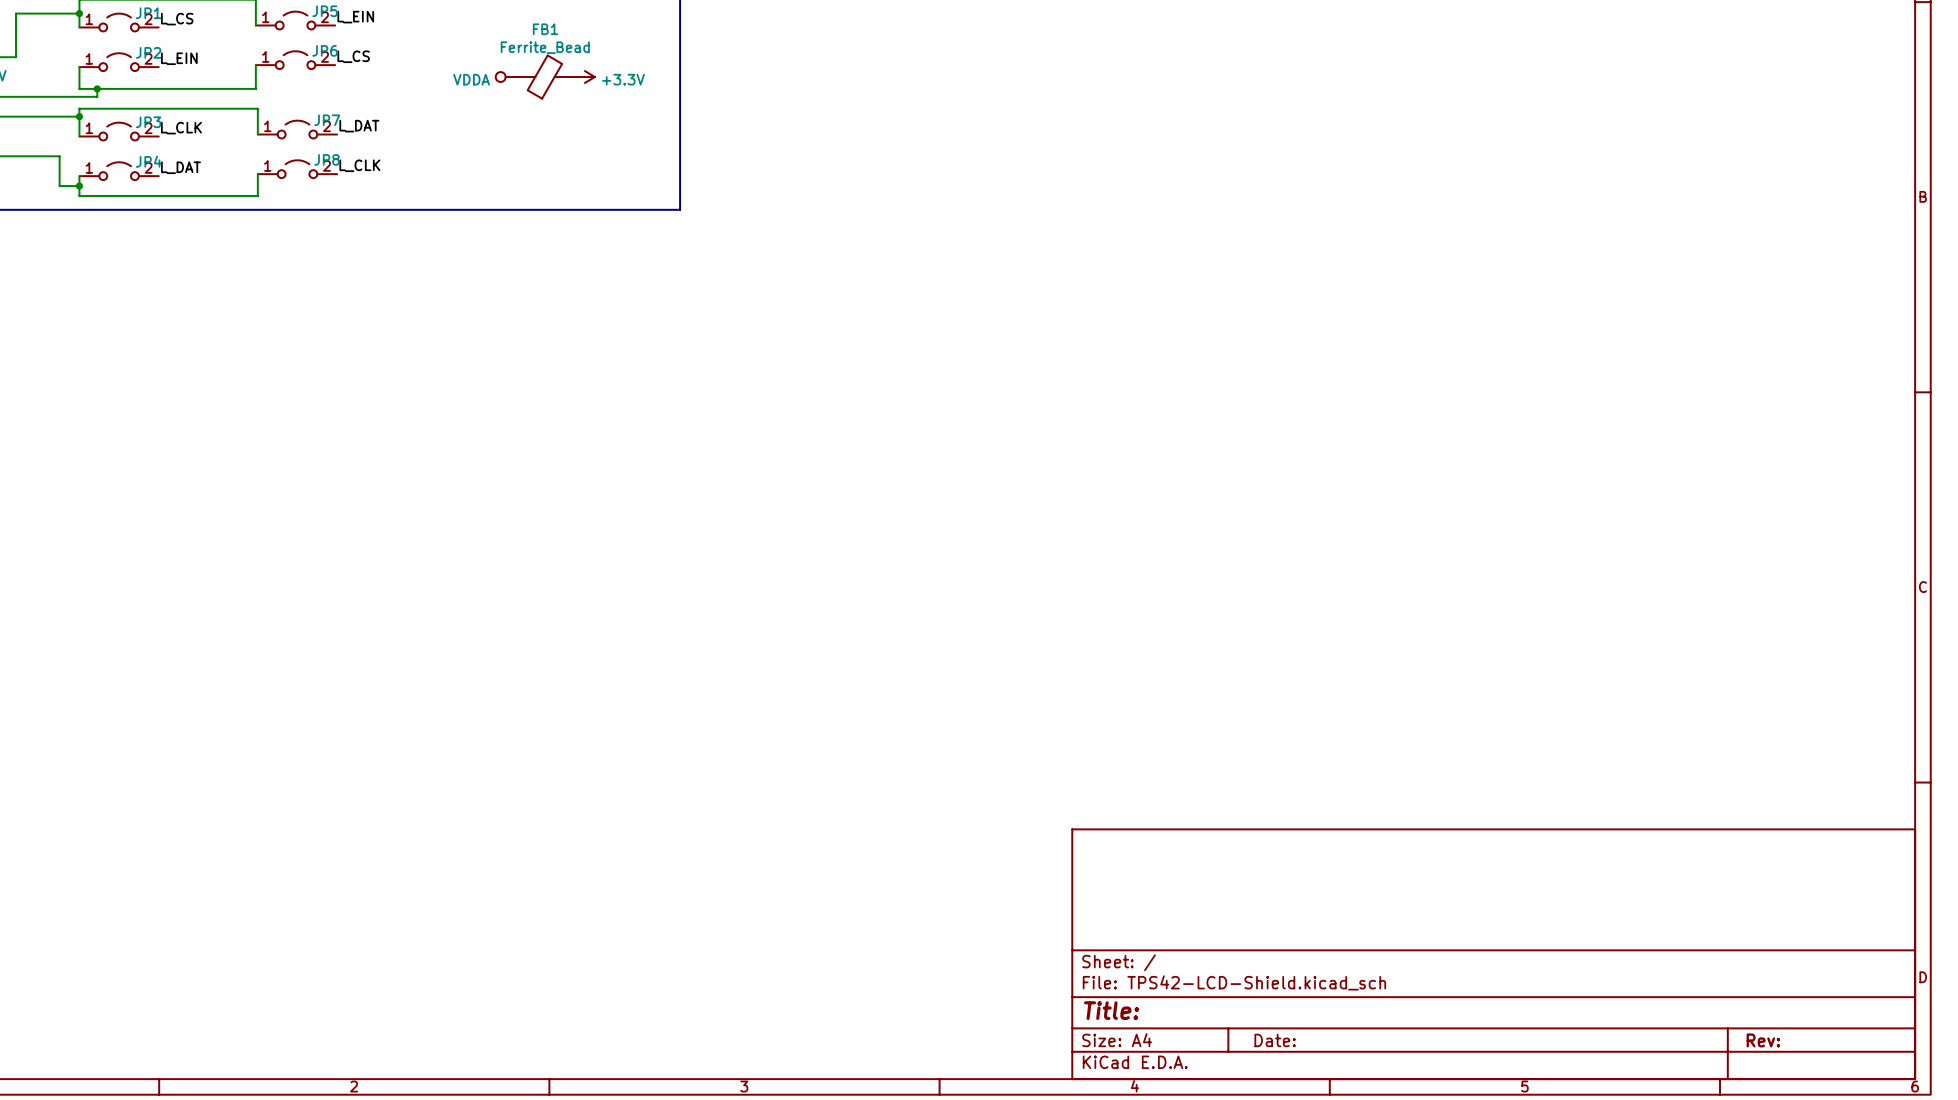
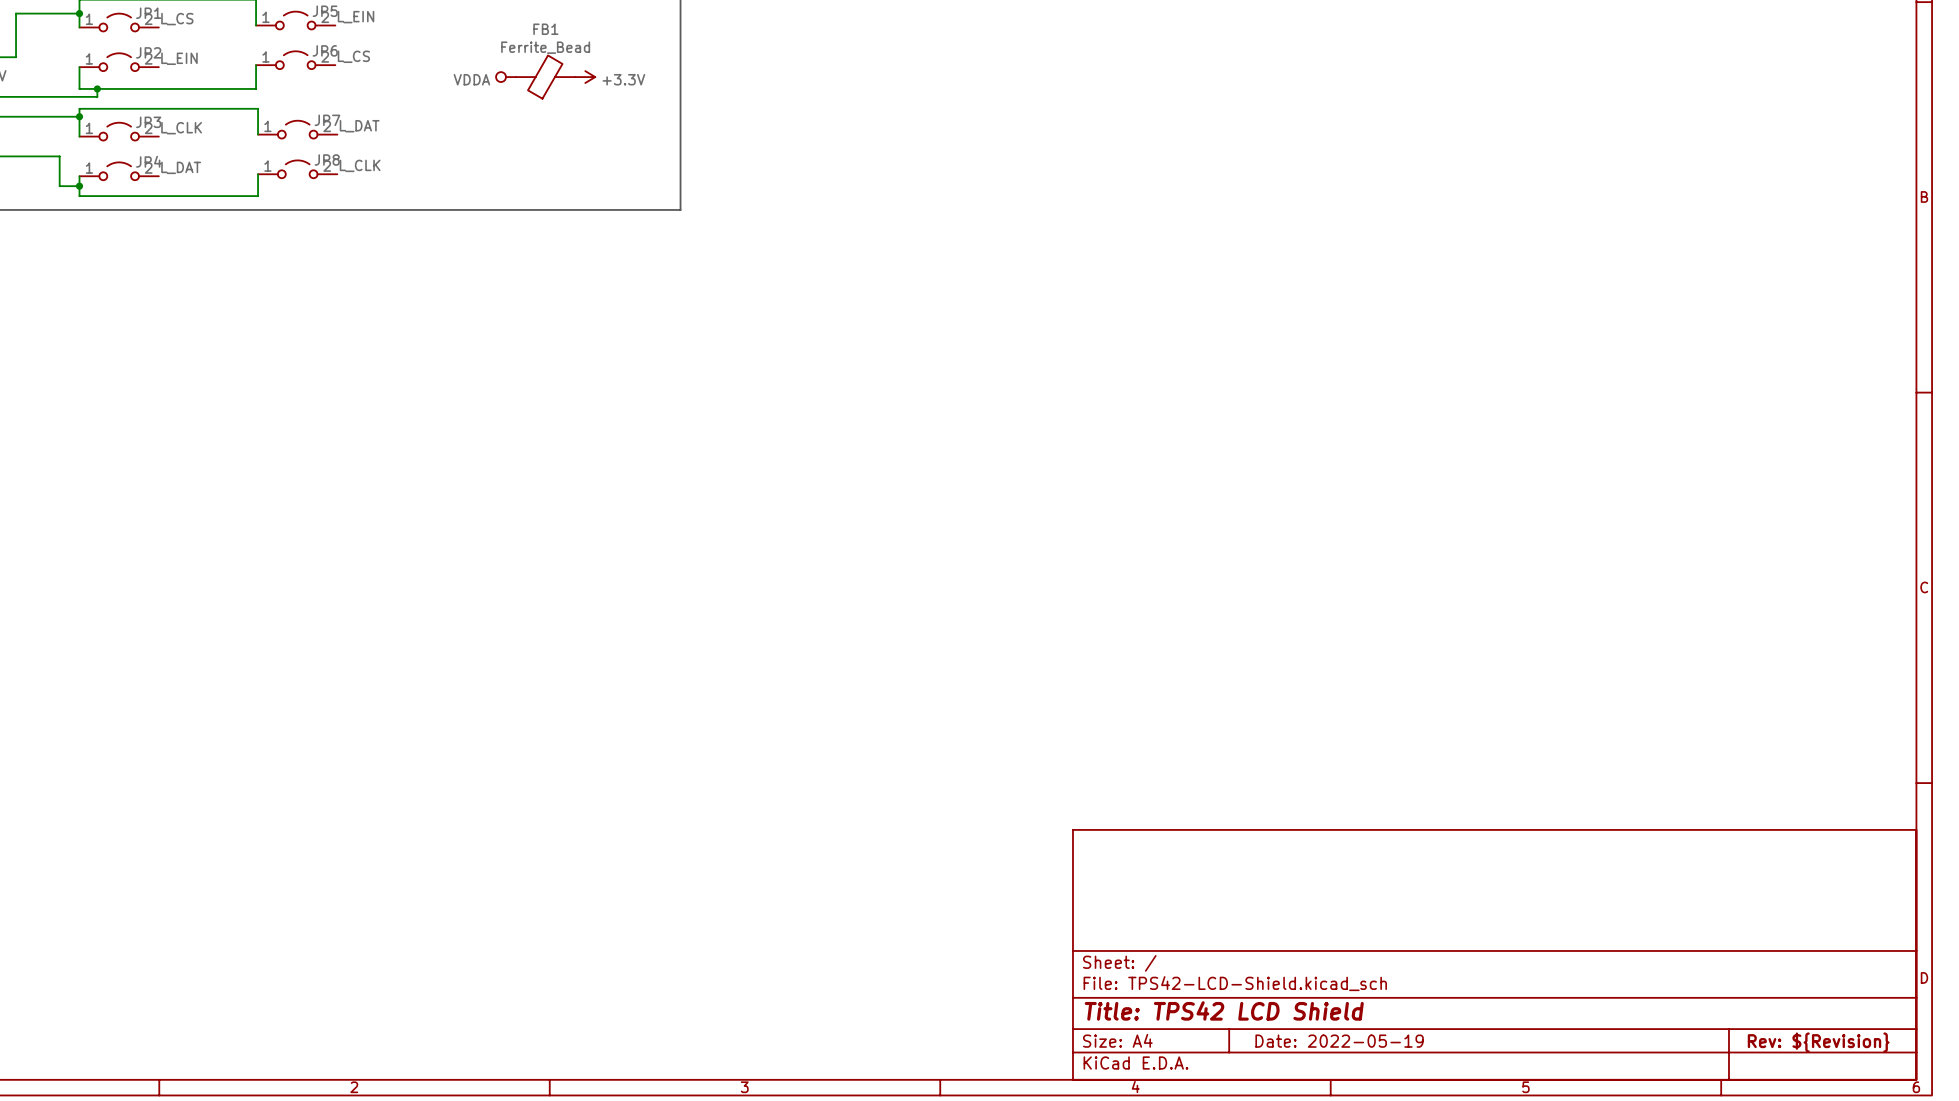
title block: Title: (1111, 1010) -> Title: TPS42 LCD Shield (1224, 1010)
title block: Date: (1275, 1040) -> Date: 2022-05-19 (1339, 1041)
title block: Rev: (1763, 1040) -> Rev: ${Revision} (1818, 1042)

